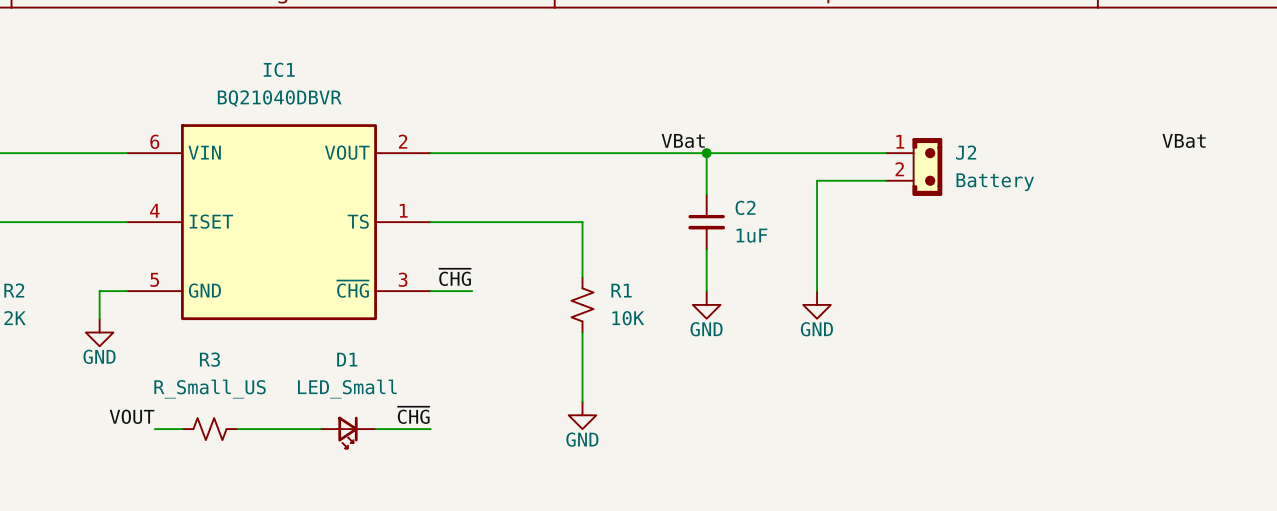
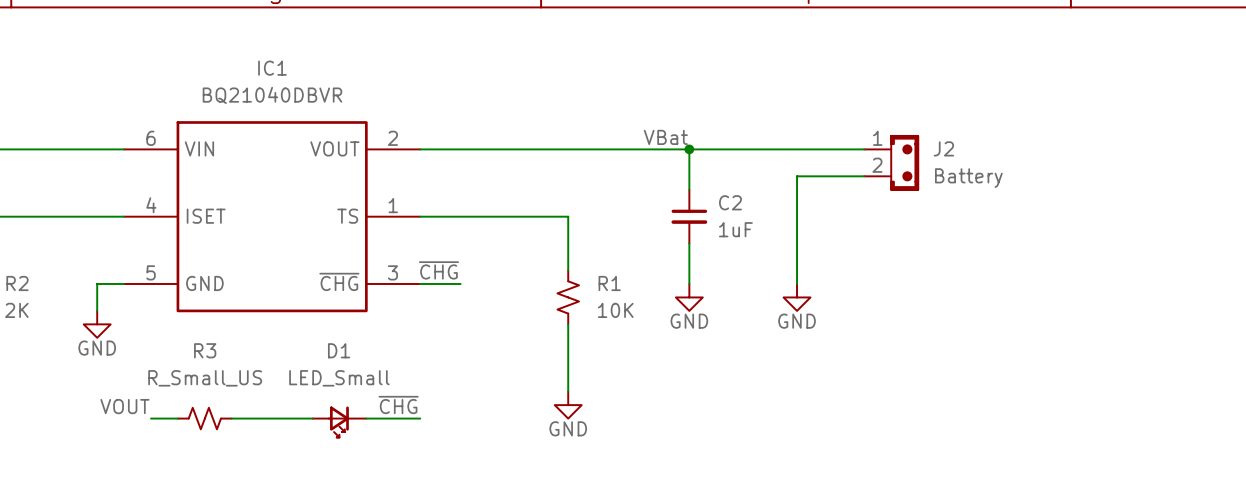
label: VBat (1184, 140) -> none

